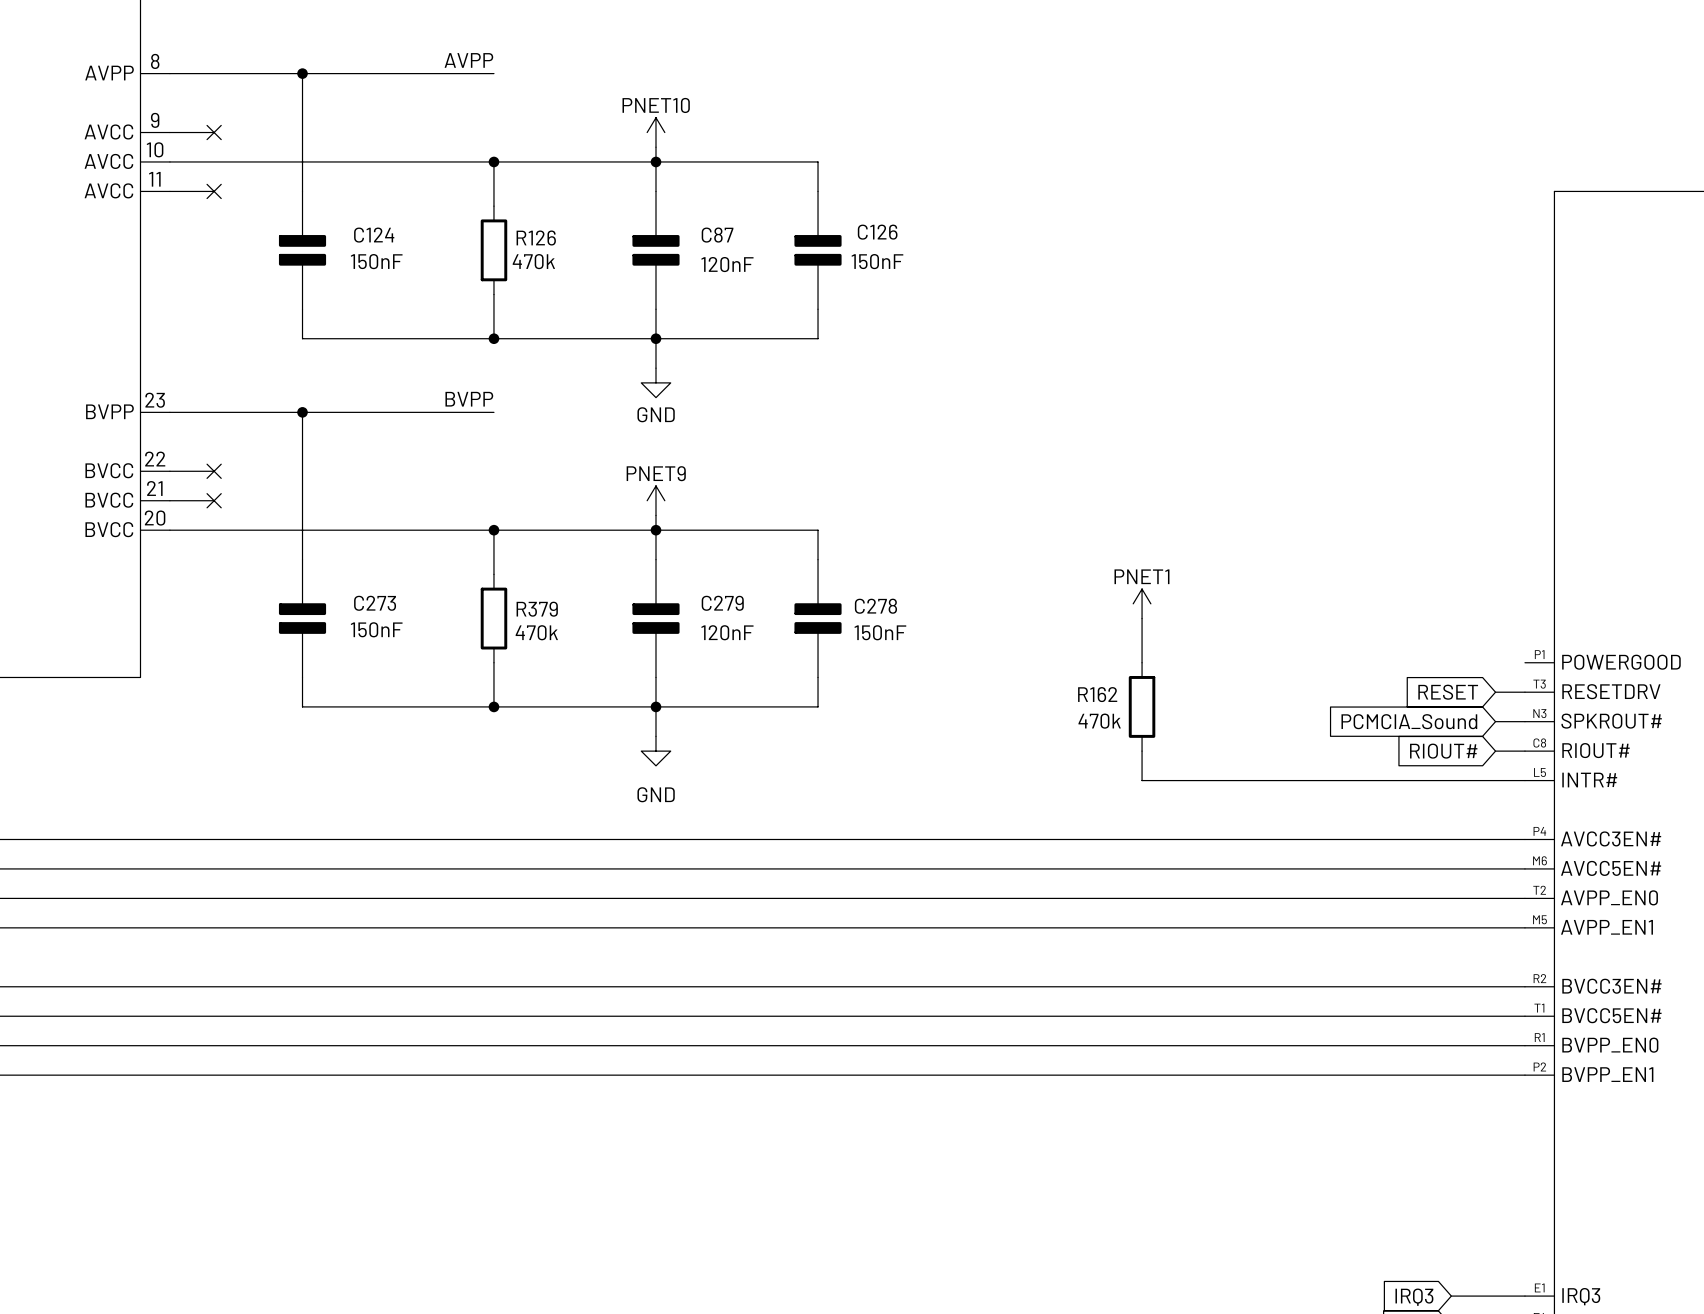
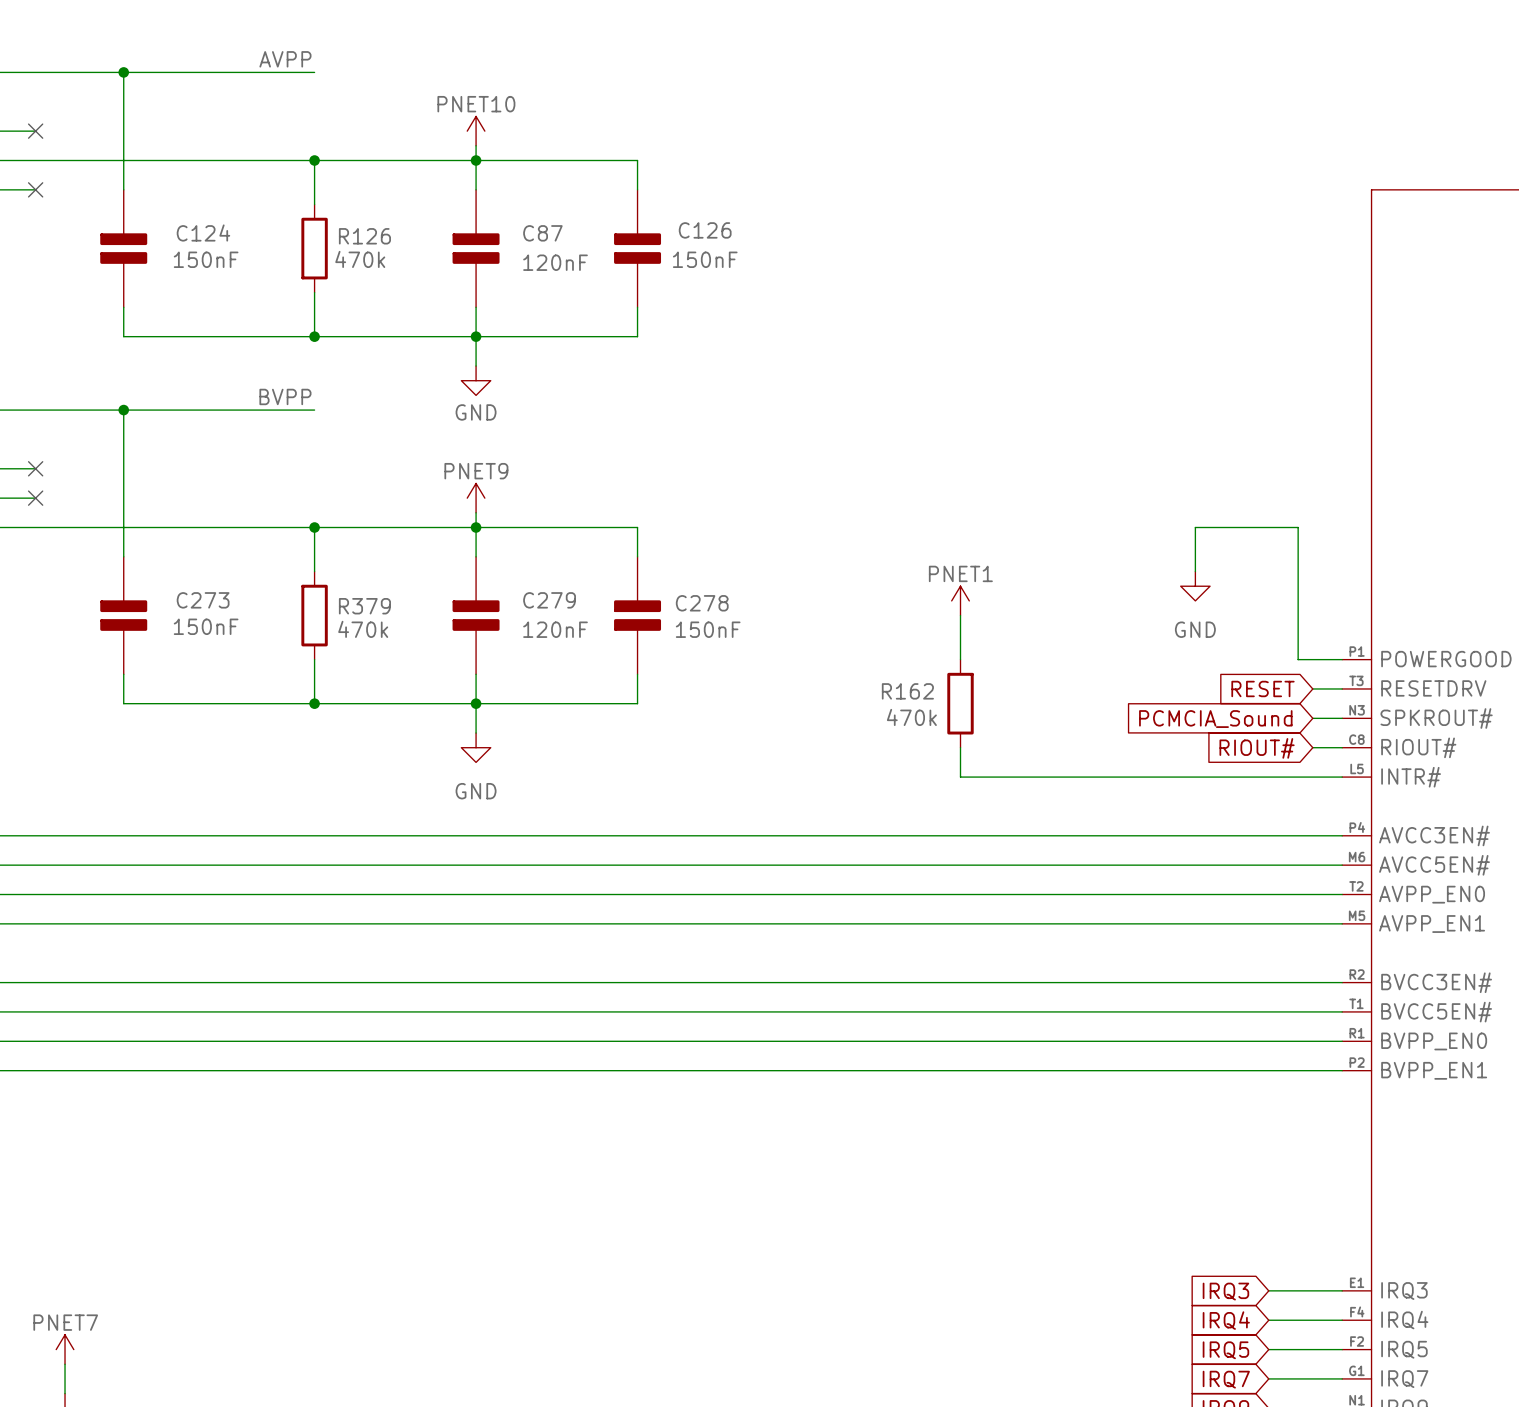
wire: none -> (1195, 571) (1195, 527) (1298, 527) (1298, 659) (1342, 659)
power symbol: none -> GND (1195, 586)

